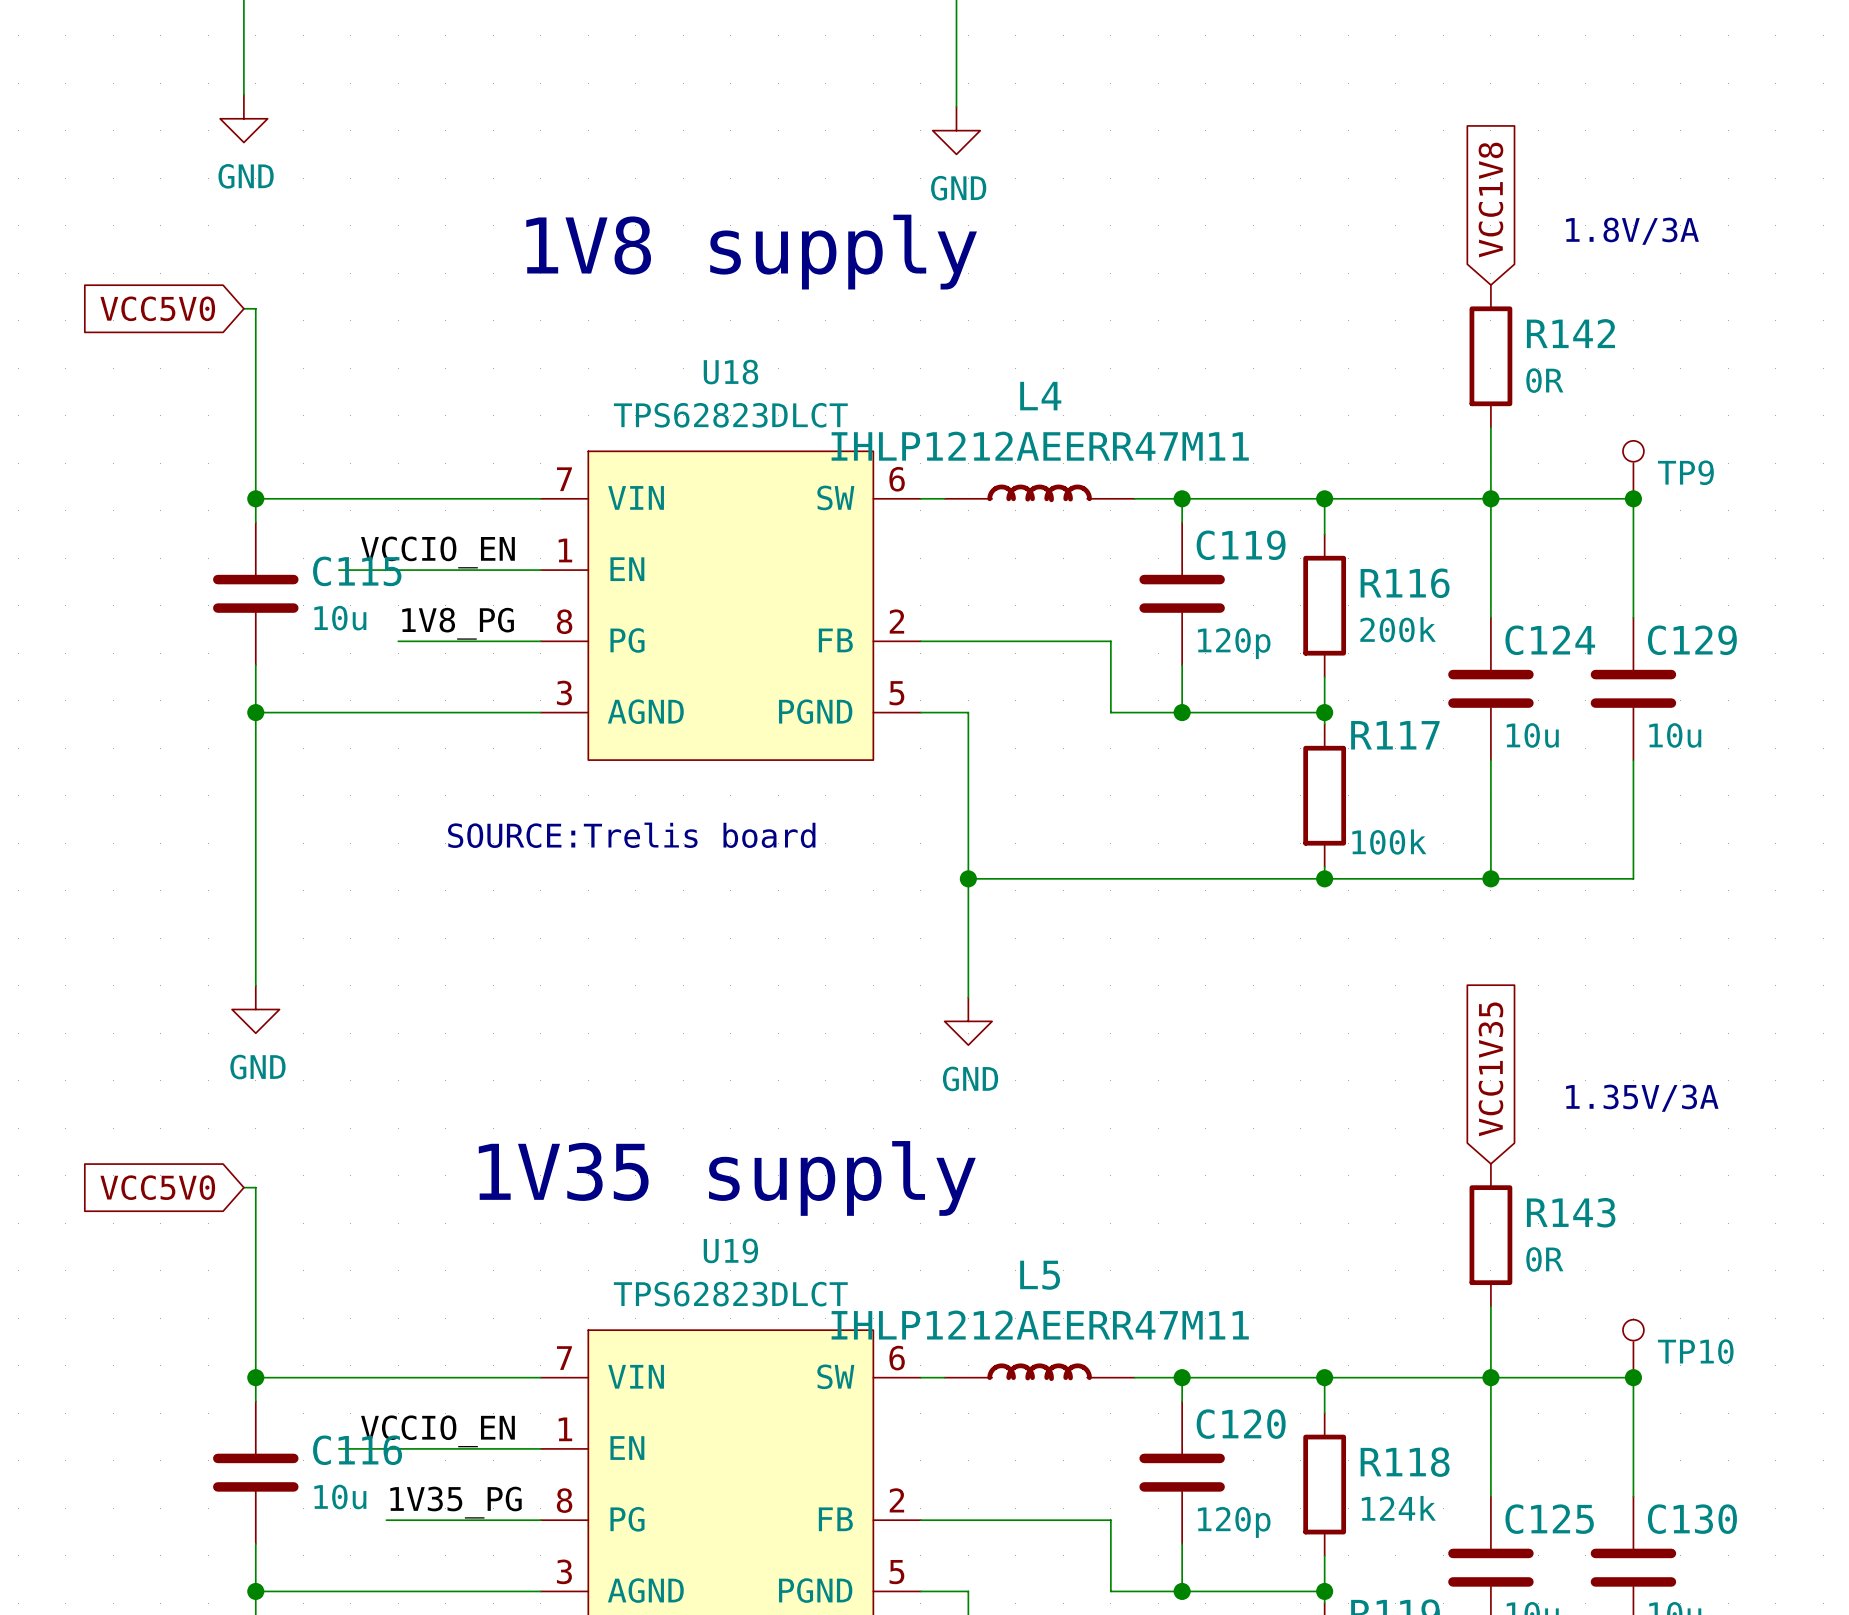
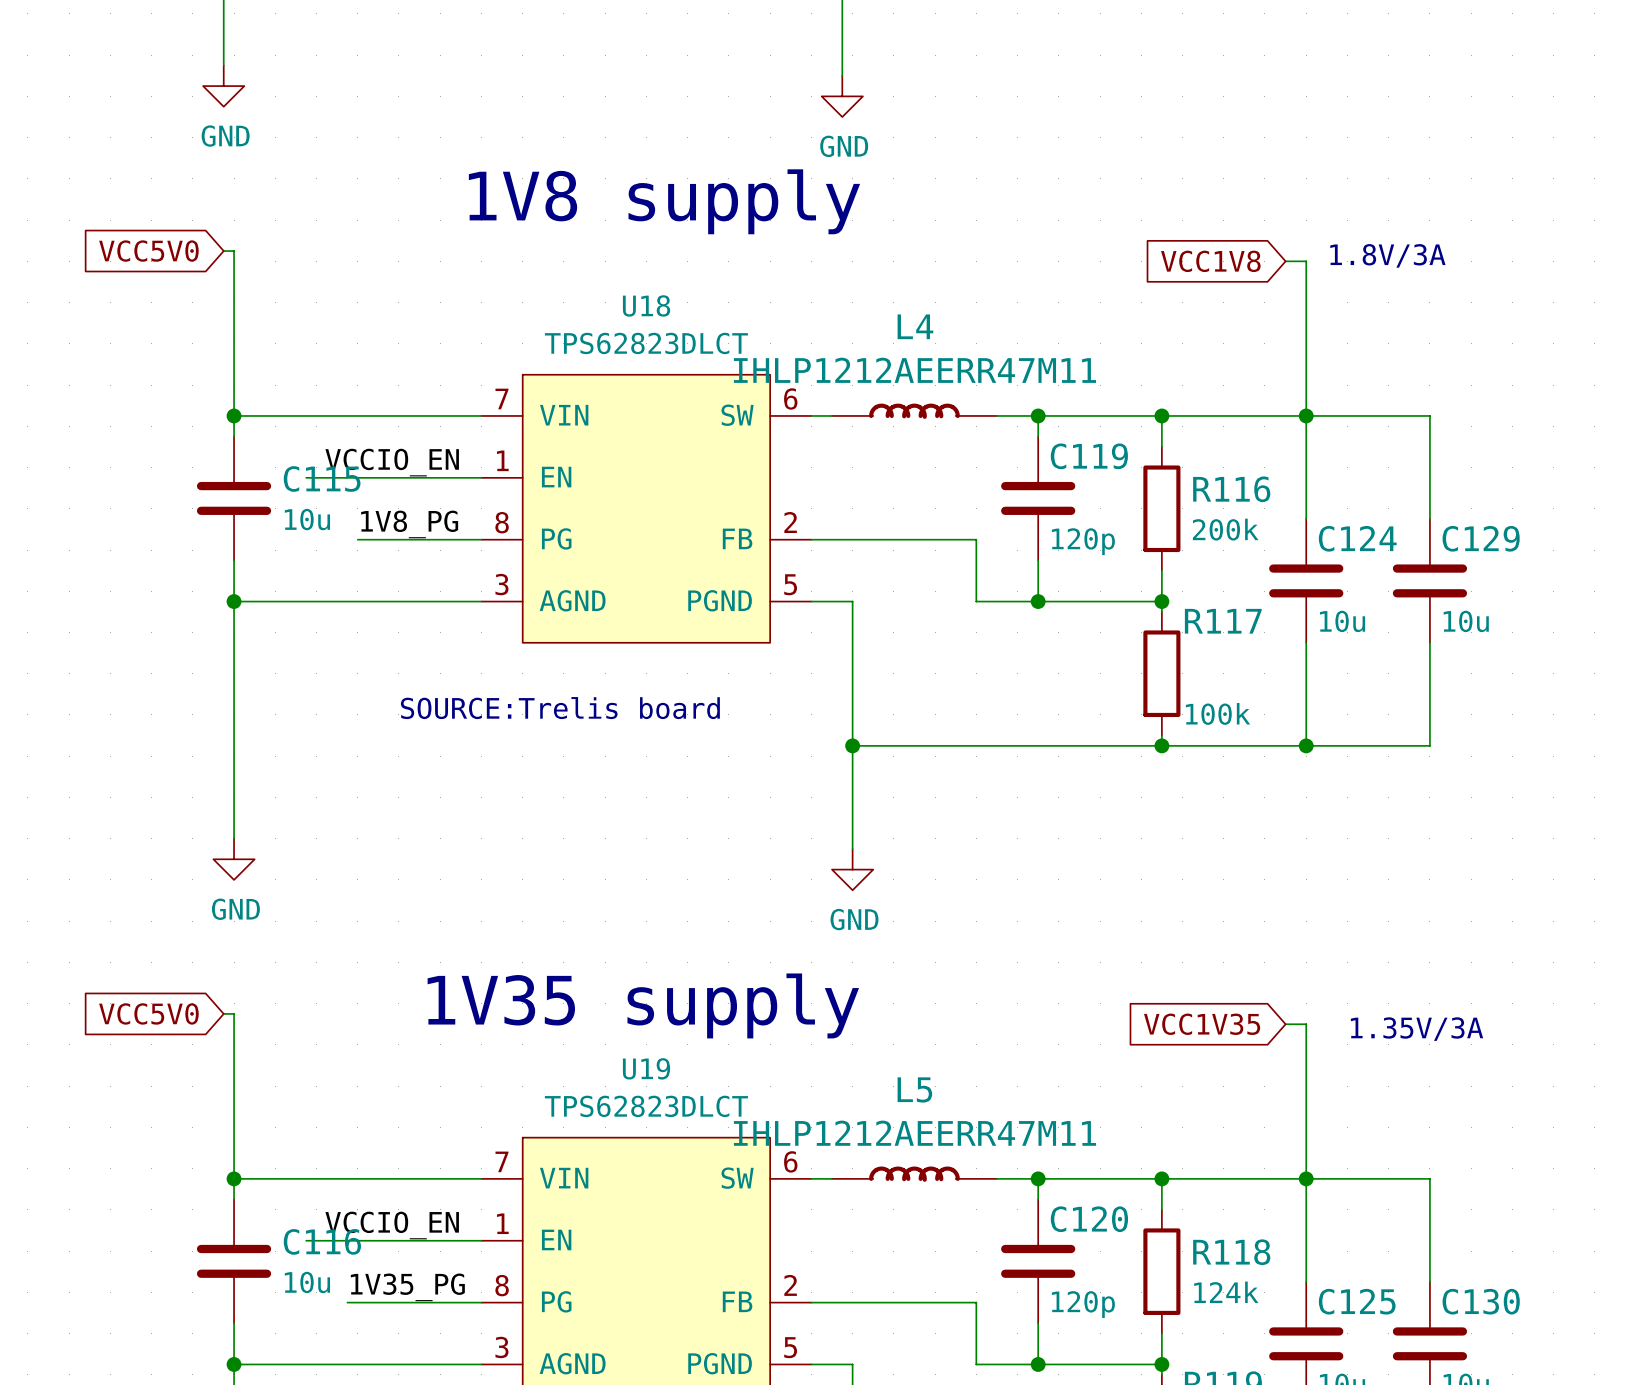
global label rotation: 0° (1490, 200) -> 90° counterclockwise (1210, 261)
text position: 1.8V/3A (1632, 231) -> 1.8V/3A (1387, 255)
wire: none -> (1285, 261) (1306, 261) (1306, 354)
R142: (1490, 356) -> none
TP9: (1633, 469) -> none
junction: (1633, 498) -> none
global label rotation: 0° (1490, 1069) -> 90° counterclockwise (1202, 1024)
text position: 1.35V/3A (1642, 1098) -> 1.35V/3A (1417, 1029)
wire: none -> (1285, 1024) (1306, 1024) (1306, 1117)
R143: (1490, 1235) -> none
TP10: (1633, 1348) -> none
junction: (1633, 1377) -> none

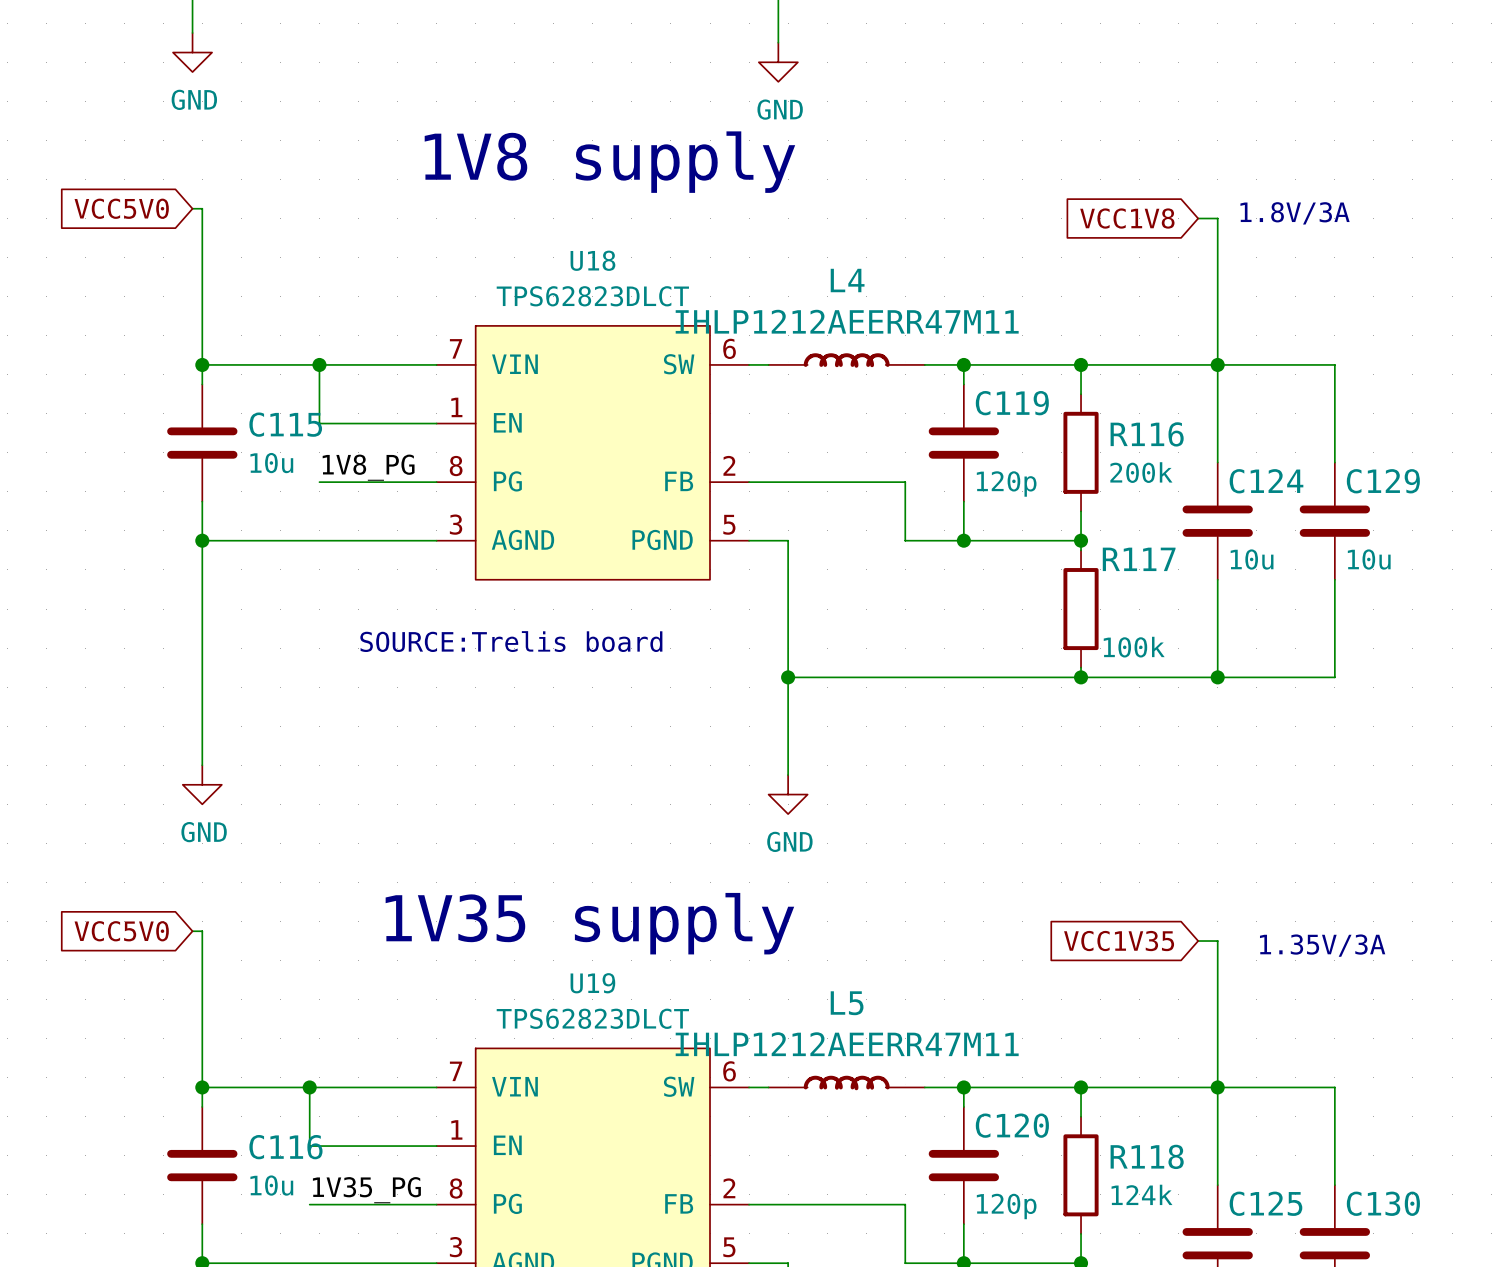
junction: none -> (319, 364)
label: VCCIO_EN (392, 462) -> none
wire: (306, 477) (357, 477) -> (319, 364) (319, 423)
junction: none -> (309, 1087)
label: VCCIO_EN (392, 1225) -> none
wire: (306, 1240) (347, 1240) -> (309, 1087) (309, 1146)

